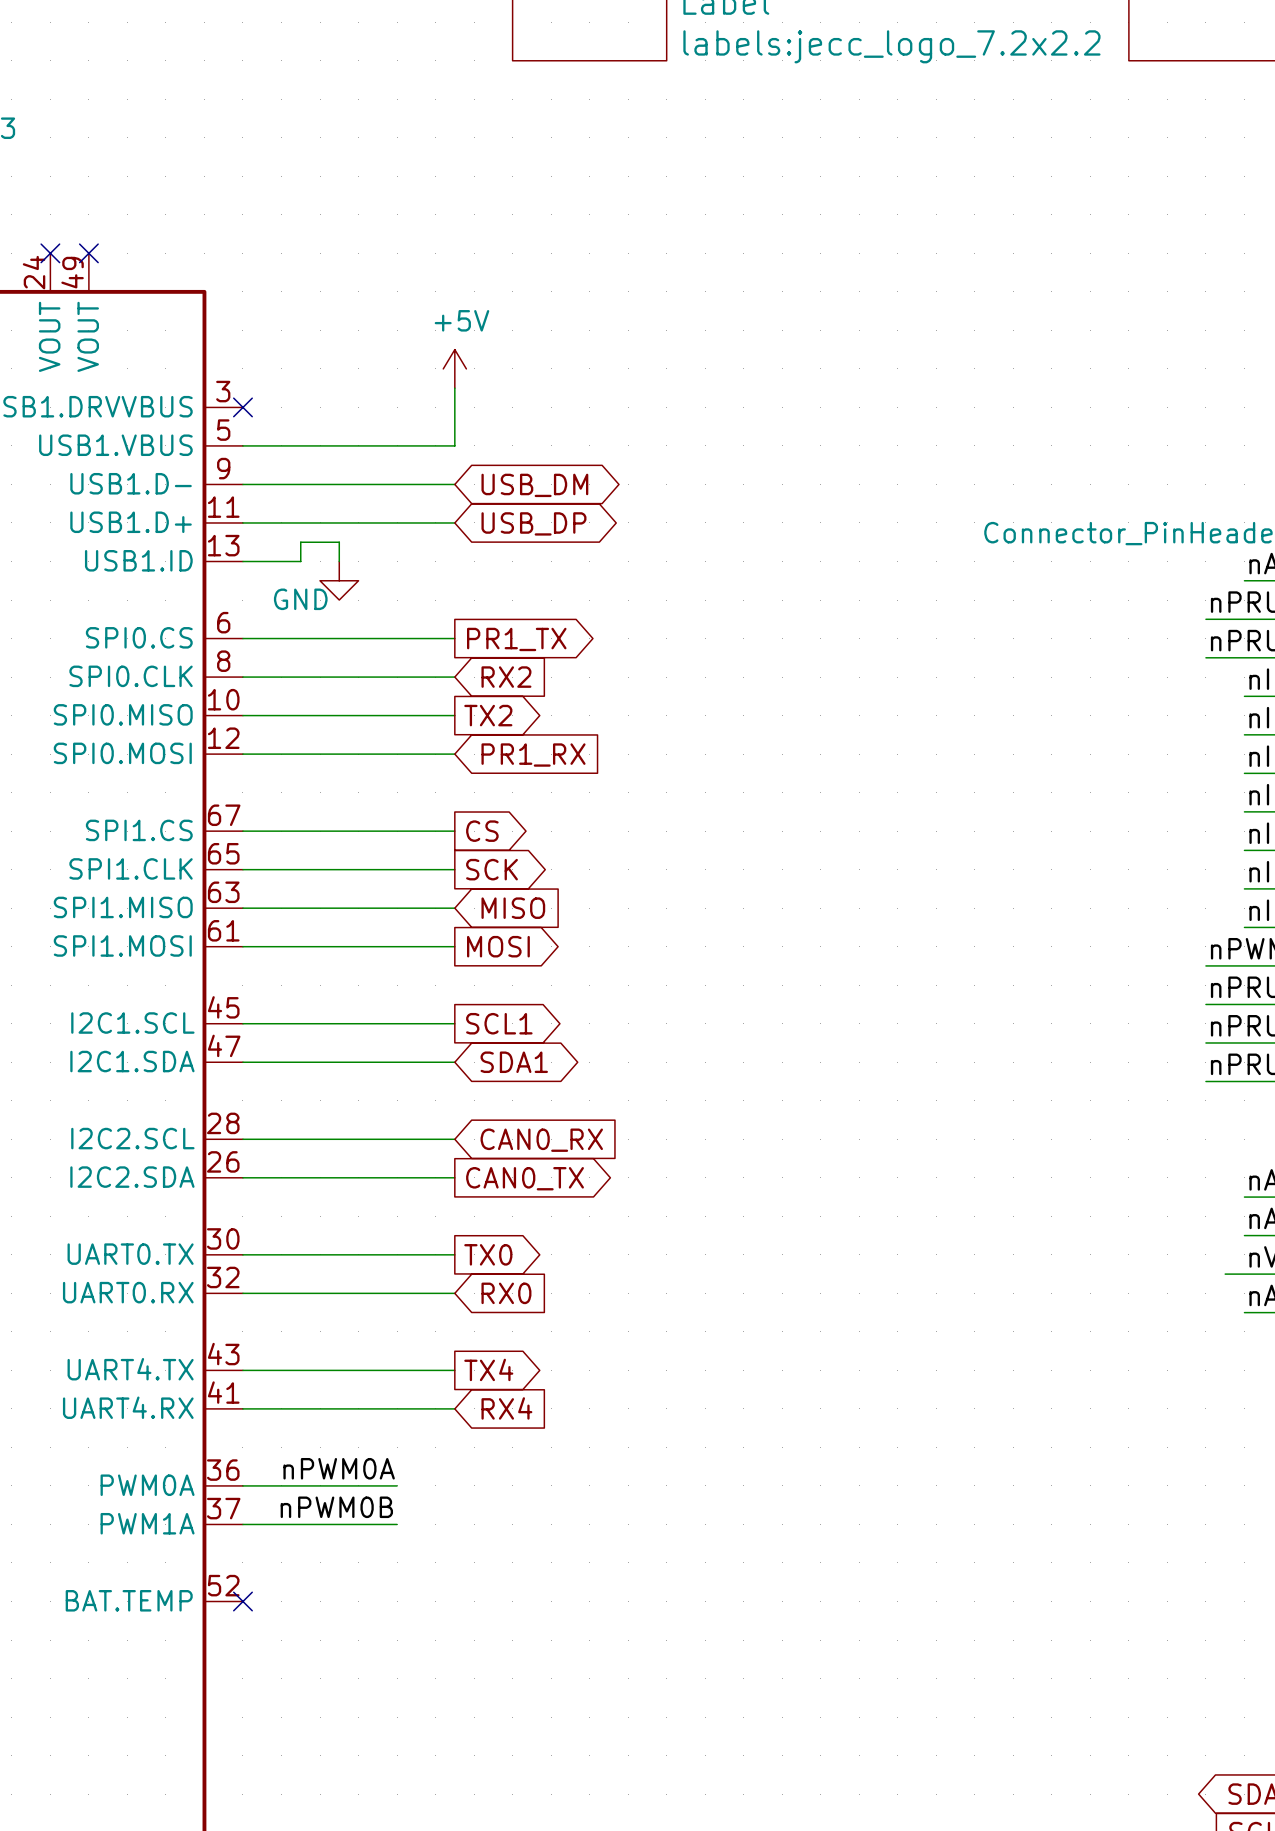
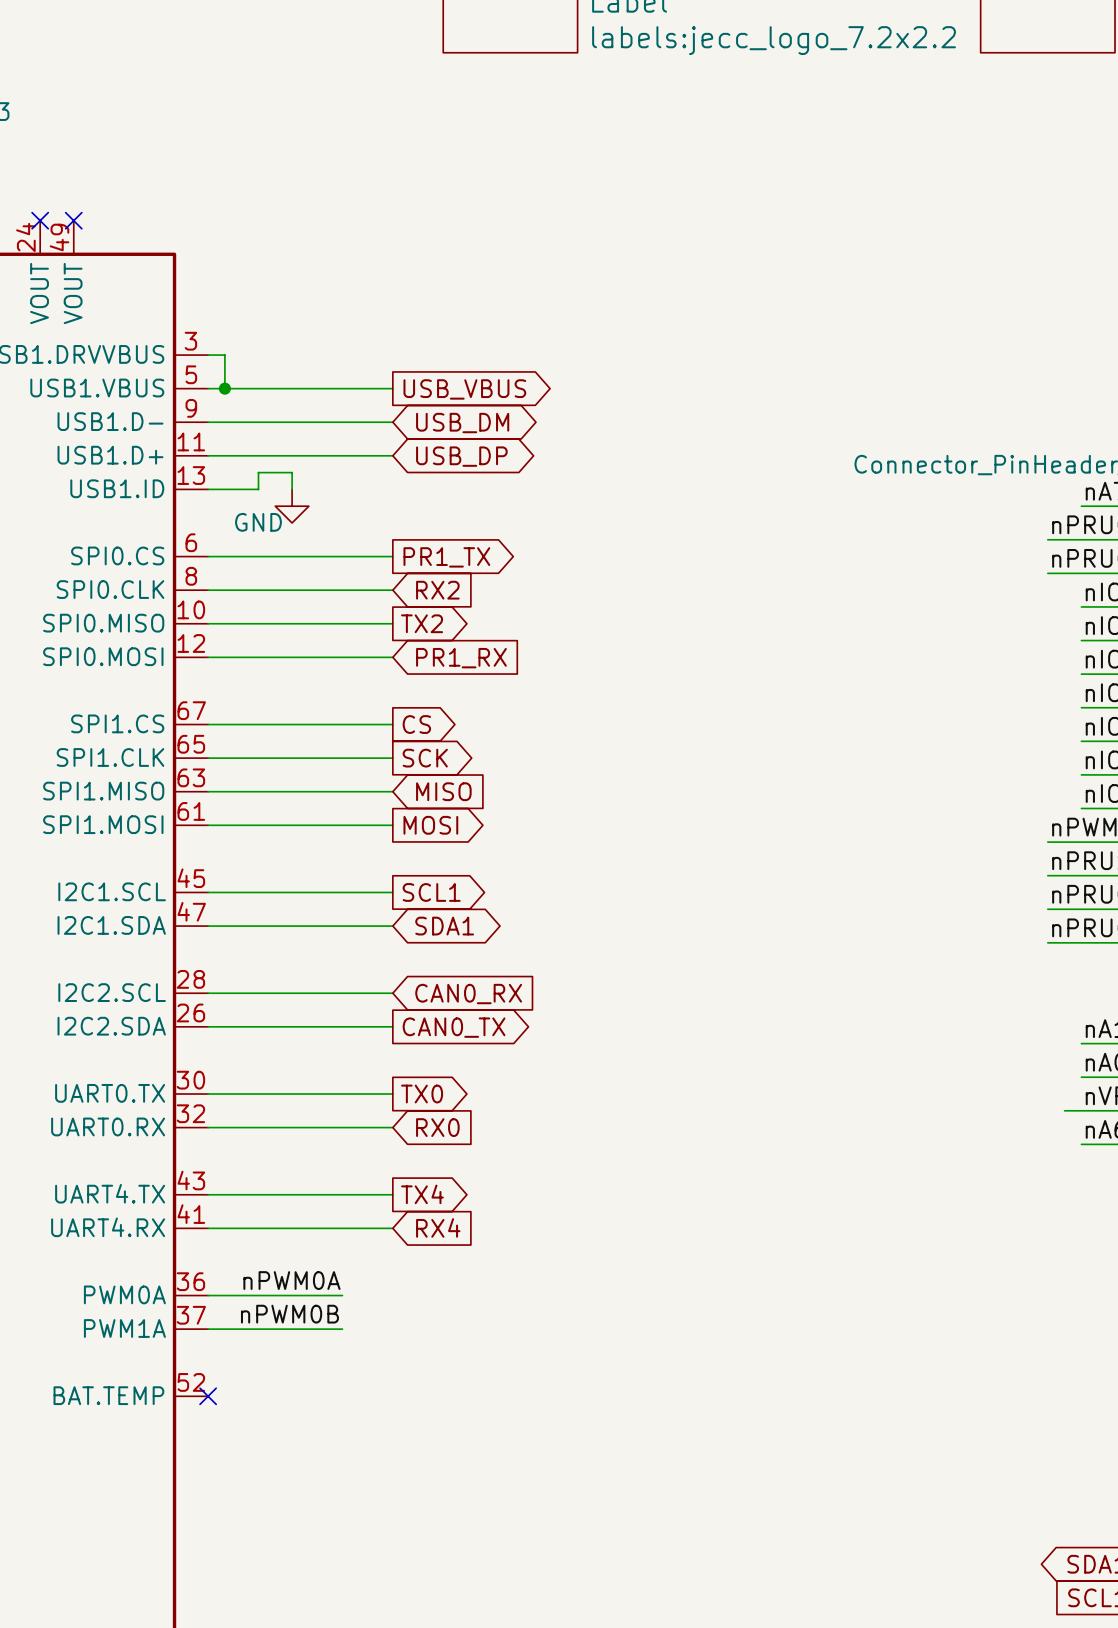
power symbol: +5V (454, 368) -> none
wire: (454, 388) (454, 445) -> none
wire: none -> (208, 355) (224, 355) (224, 388)
no-connect mark: (242, 407) -> none
junction: none -> (224, 388)
global label: none -> USB_VBUS (464, 389)

